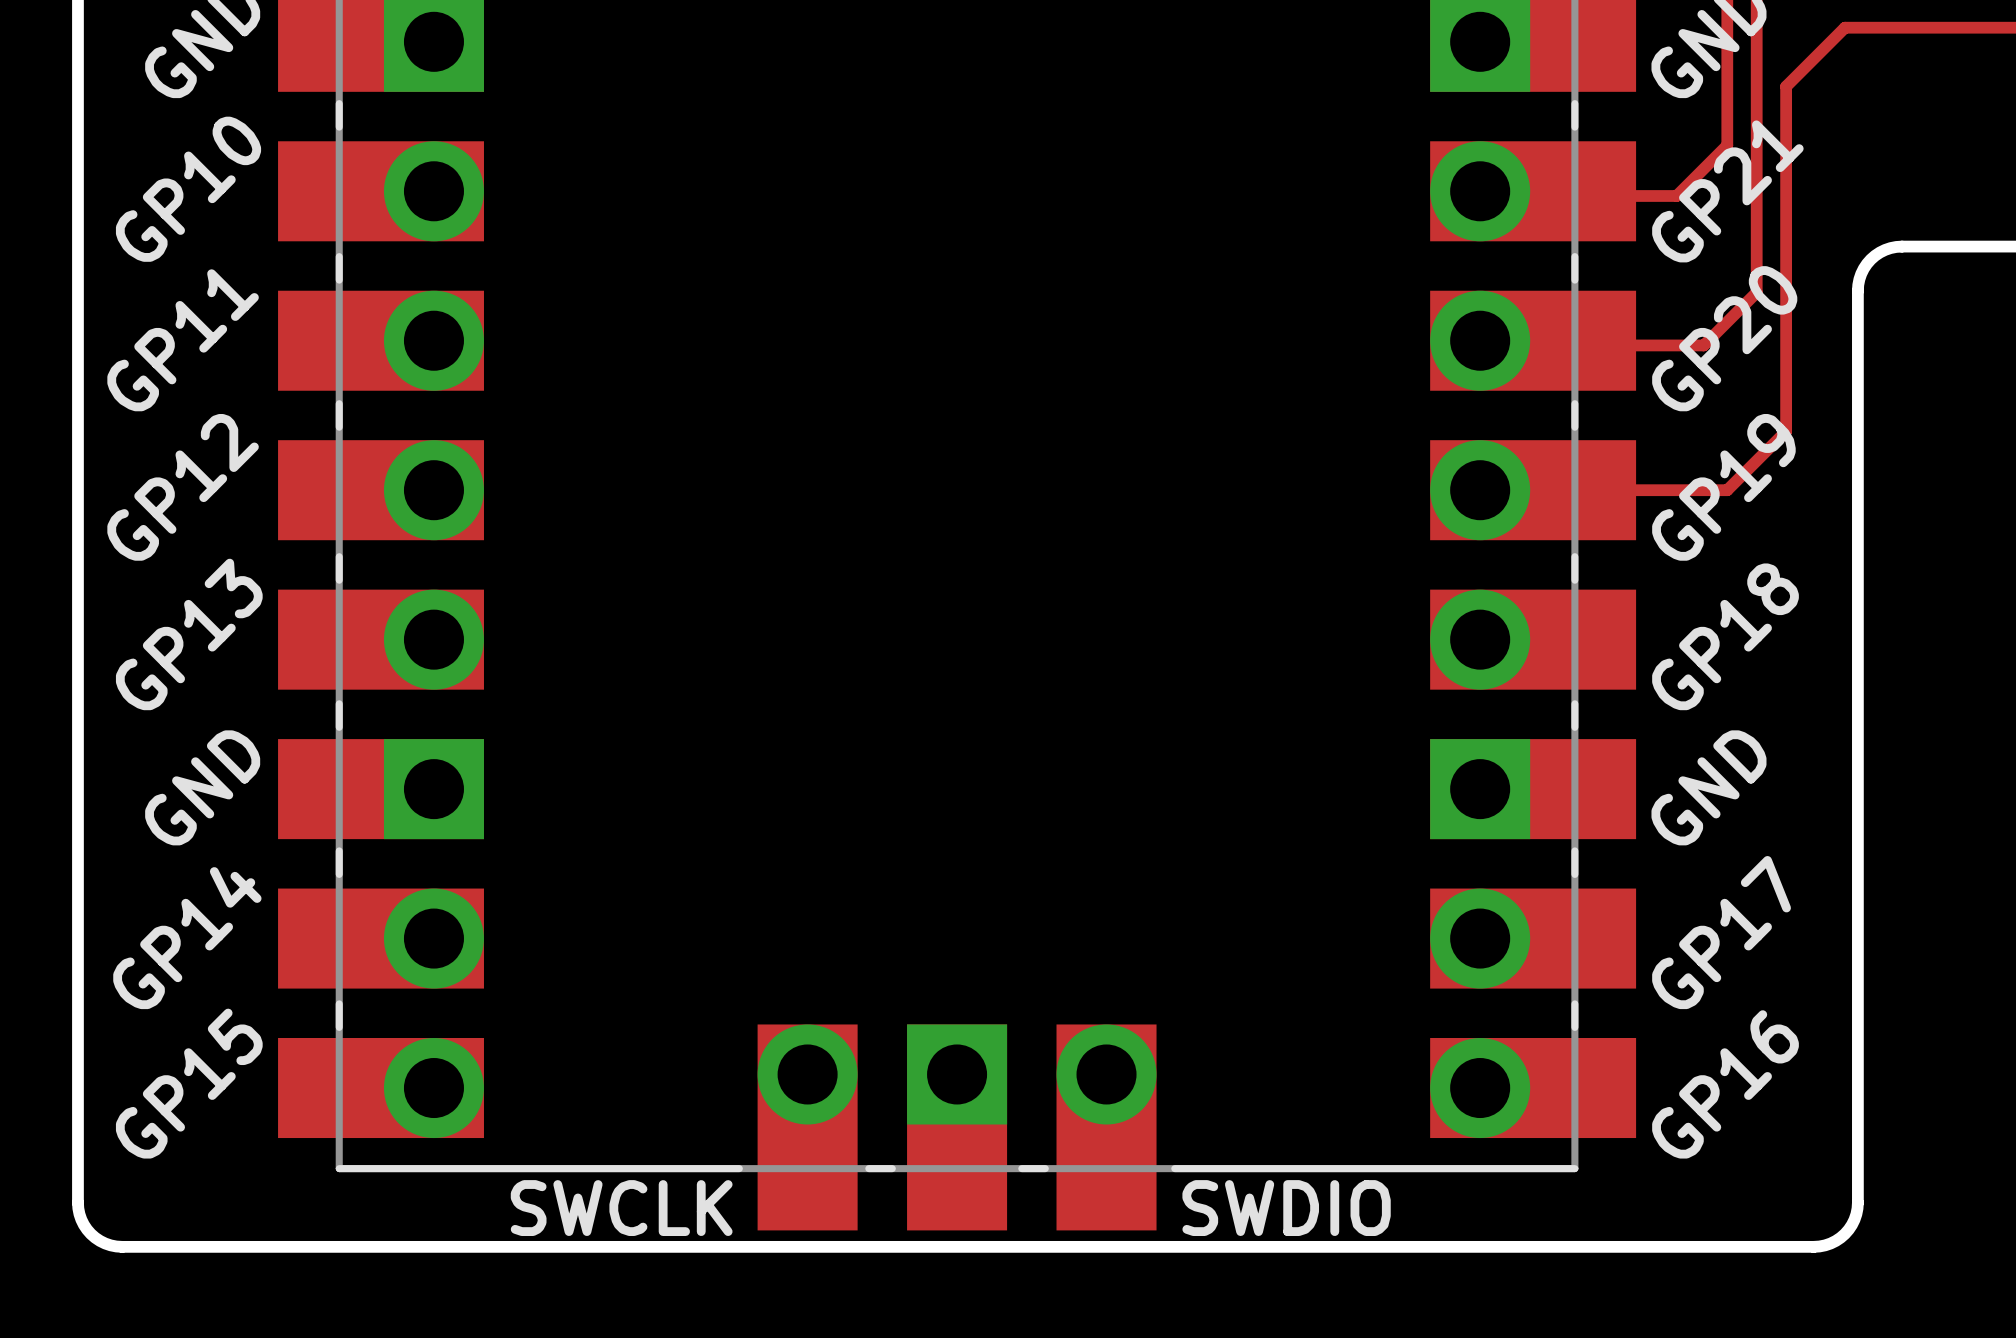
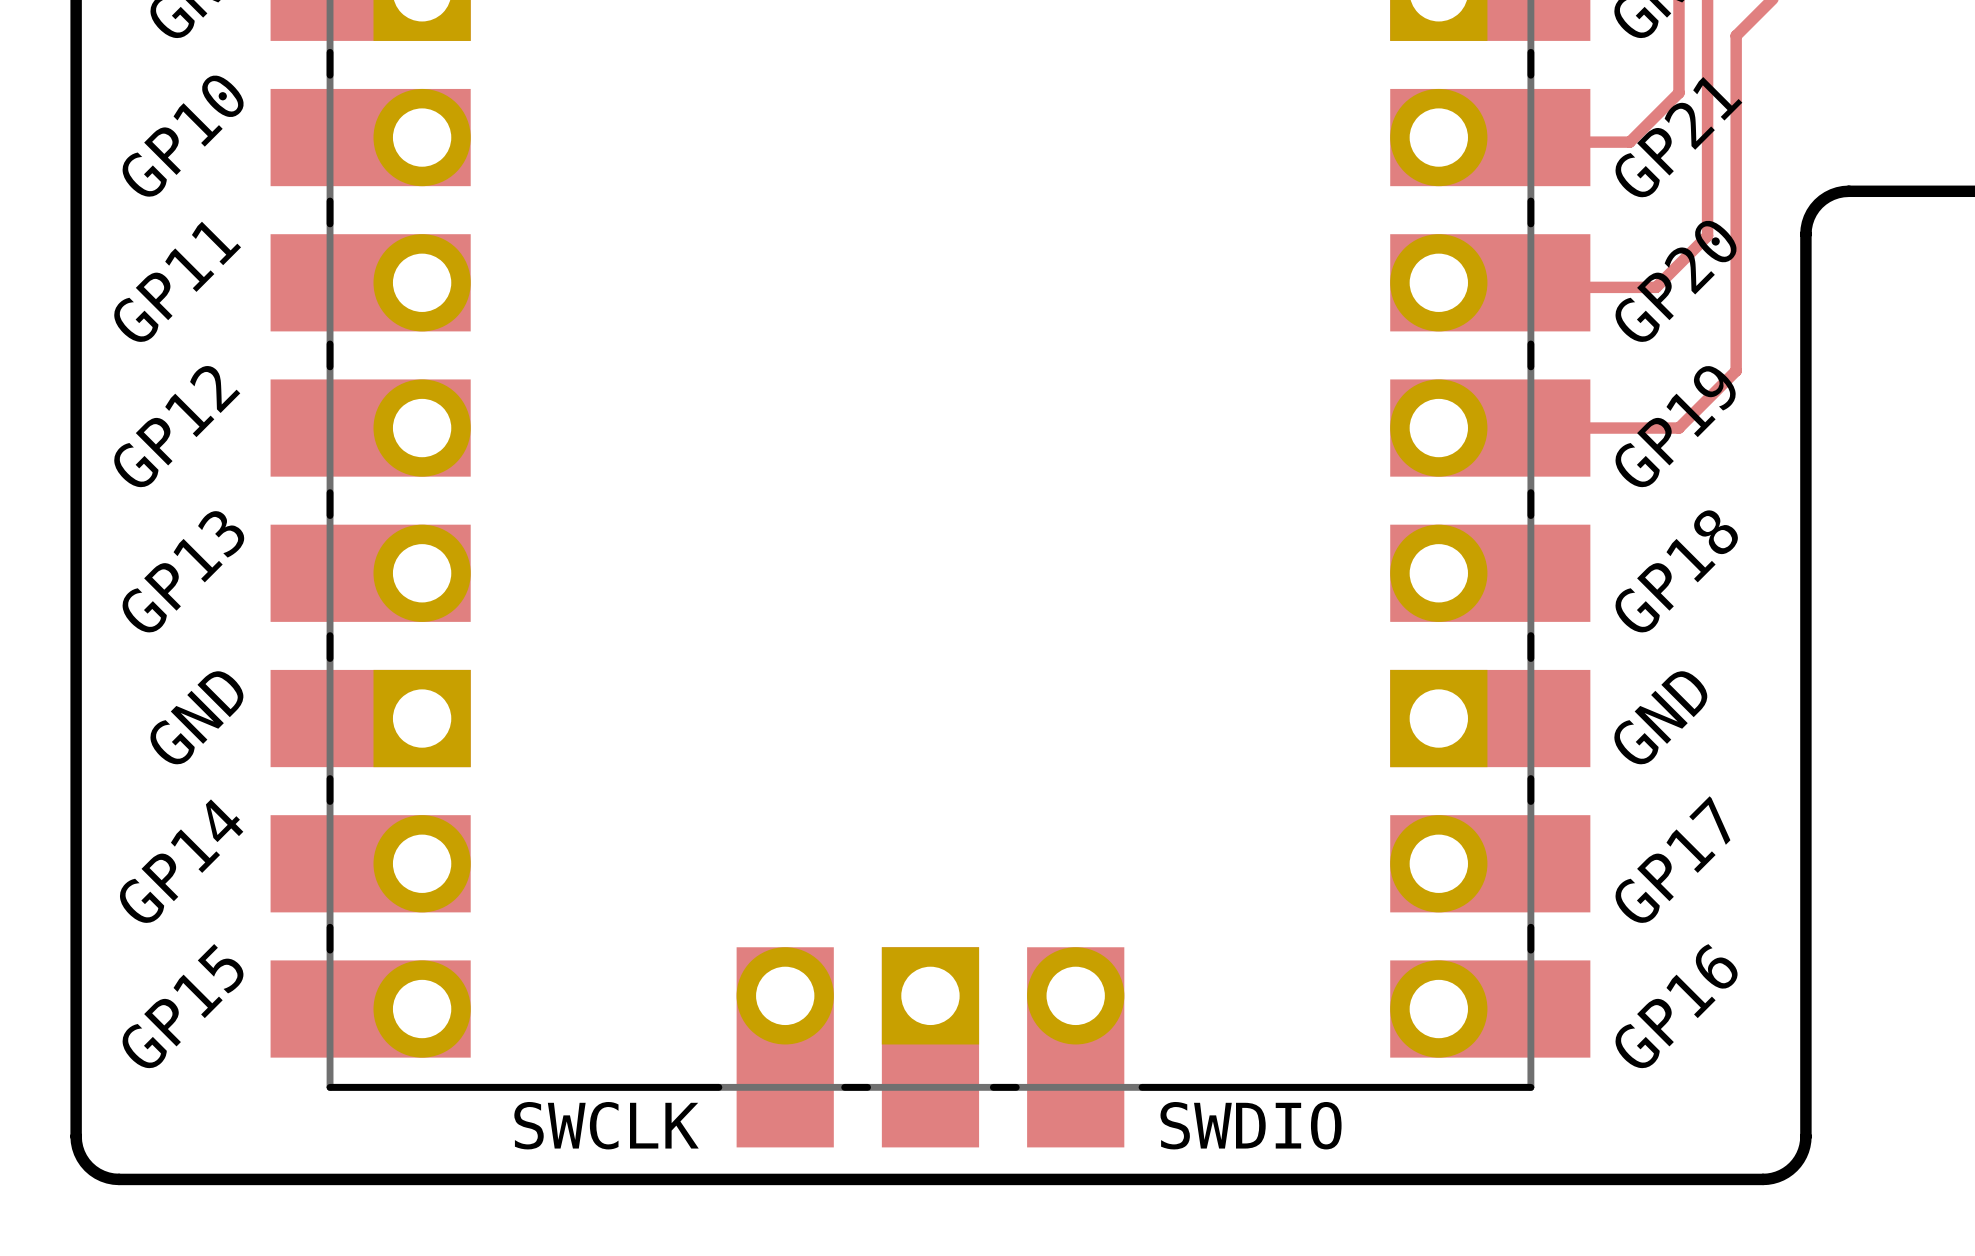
board edge: (77, 1202) (81, 1219) (90, 1233) (105, 1243) (122, 1246) (1813, 1246) (1830, 1243) (1844, 1233) (1854, 1219) (1857, 1202) -> (76, 1120) (77, 1147) (84, 1162) (102, 1176) (119, 1179) (1763, 1179) (1781, 1175) (1796, 1163) (1804, 1146) (1805, 1120)

